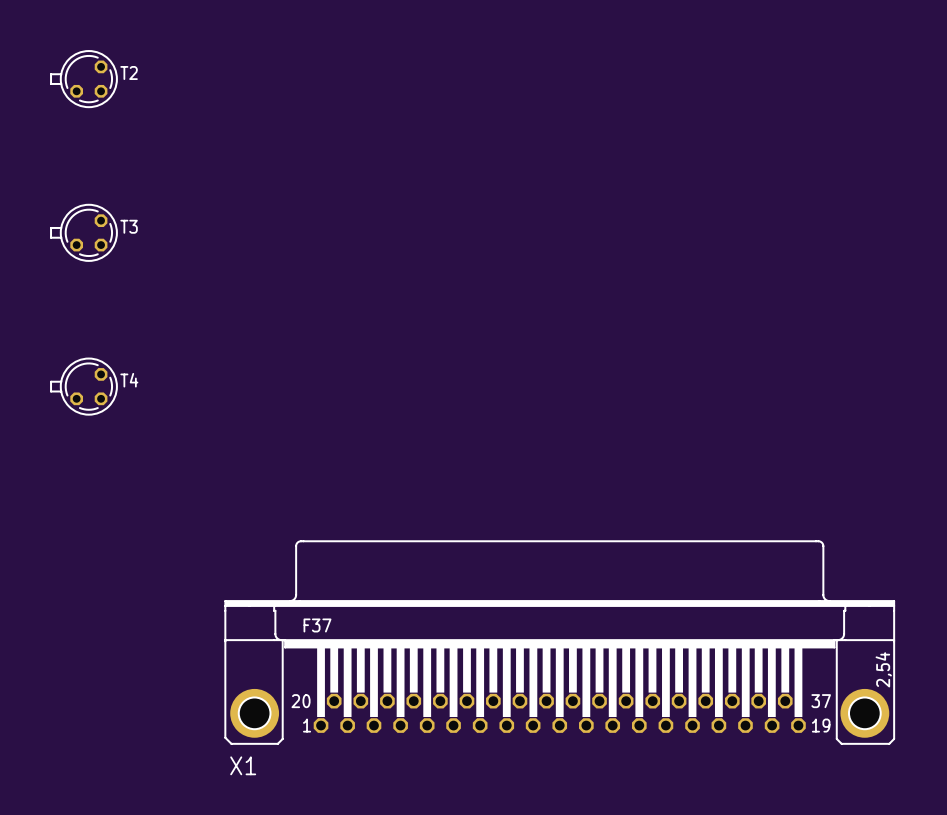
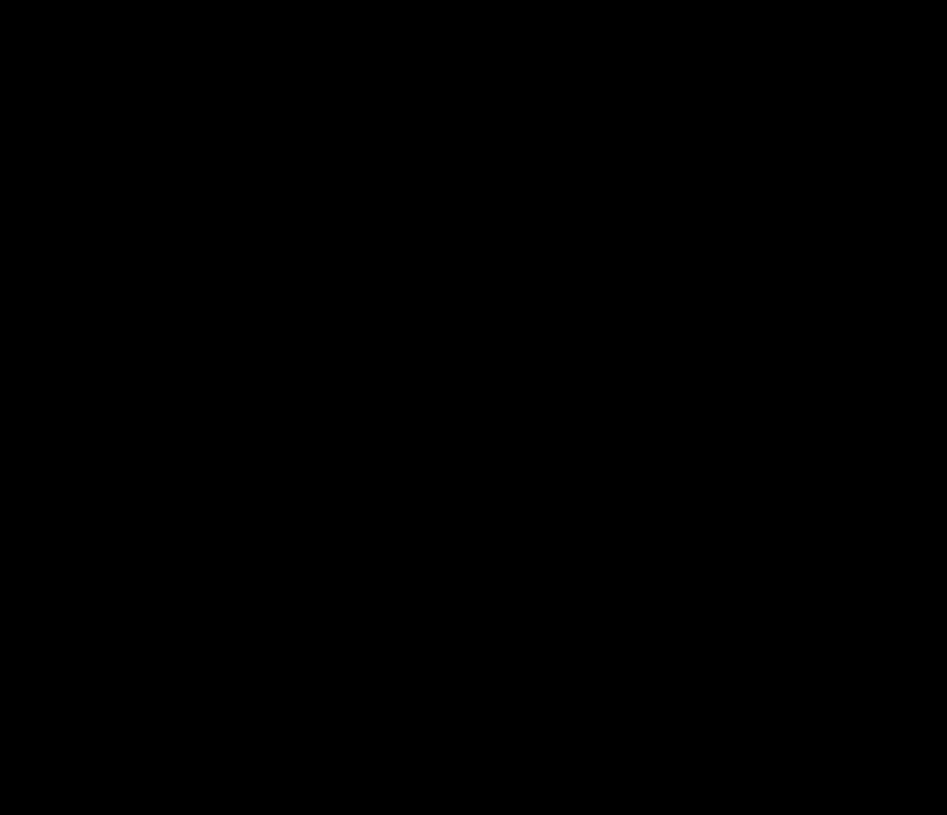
T2: (83, 79) -> none
T3: (83, 232) -> none
T4: (83, 386) -> none
X1: (559, 642) -> none

